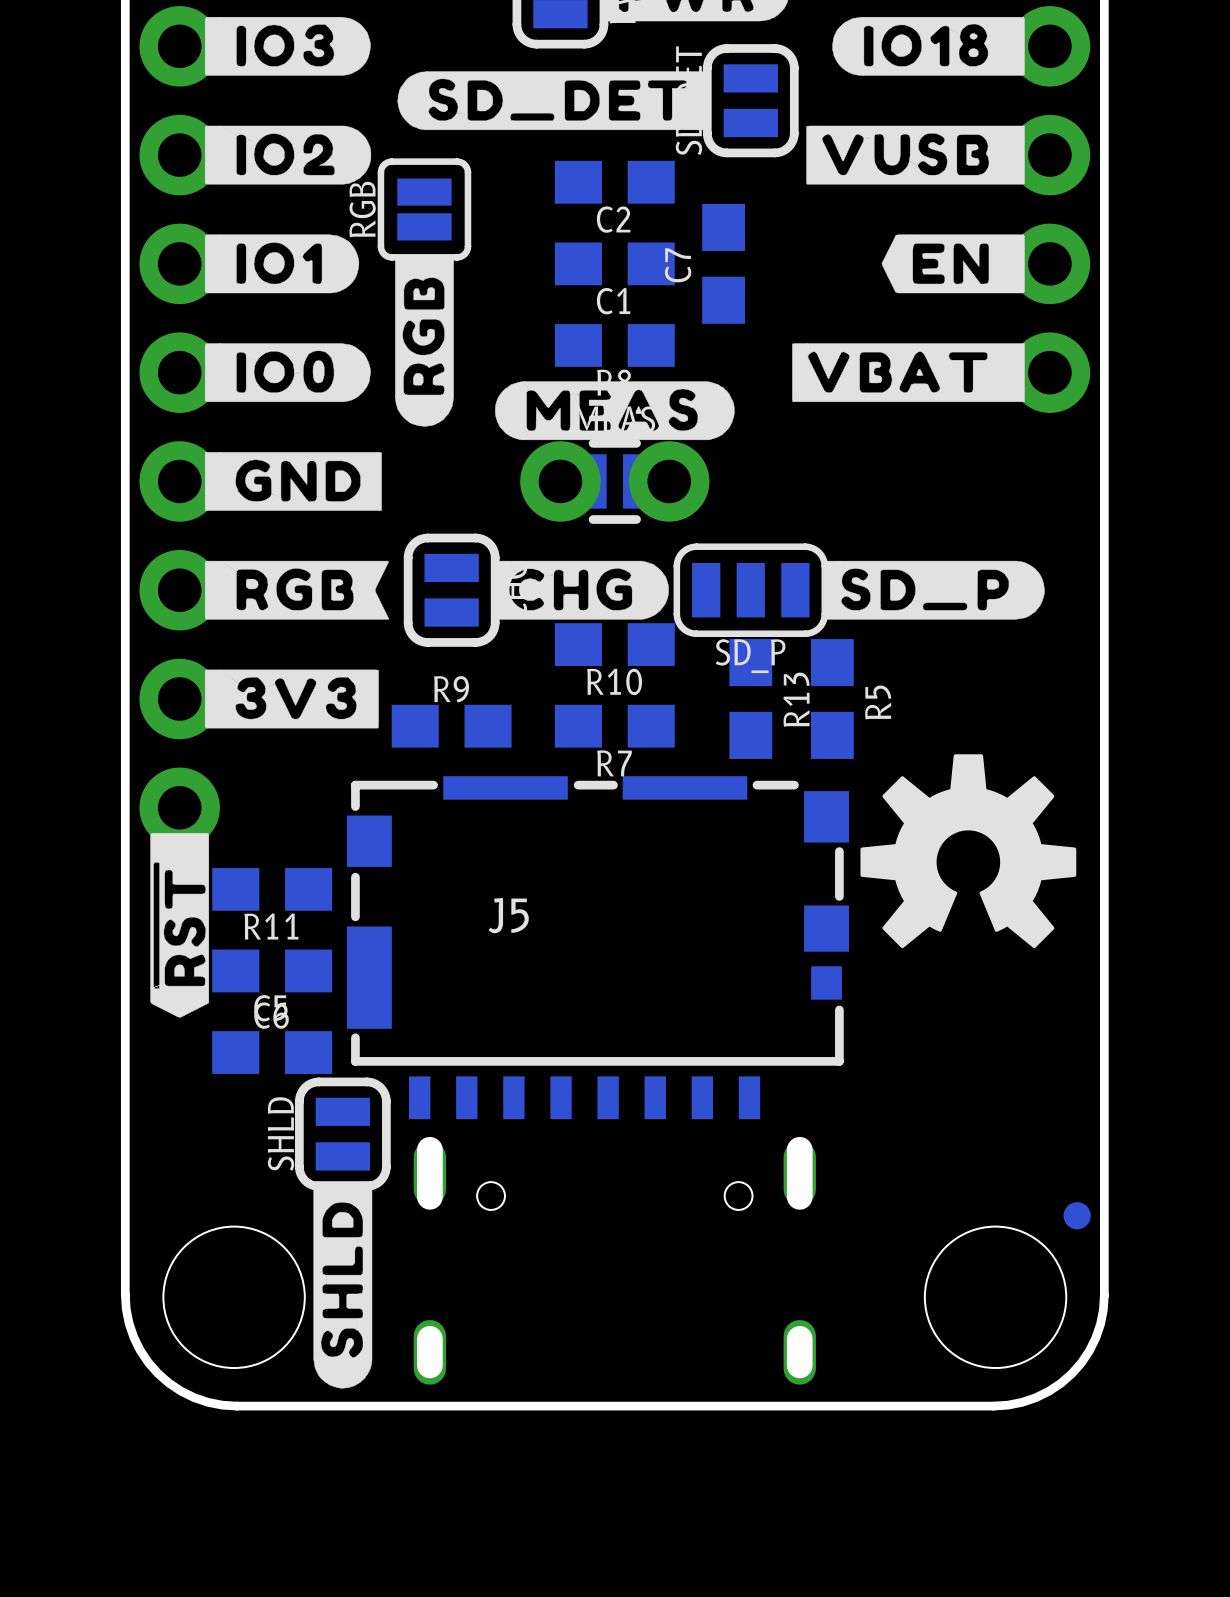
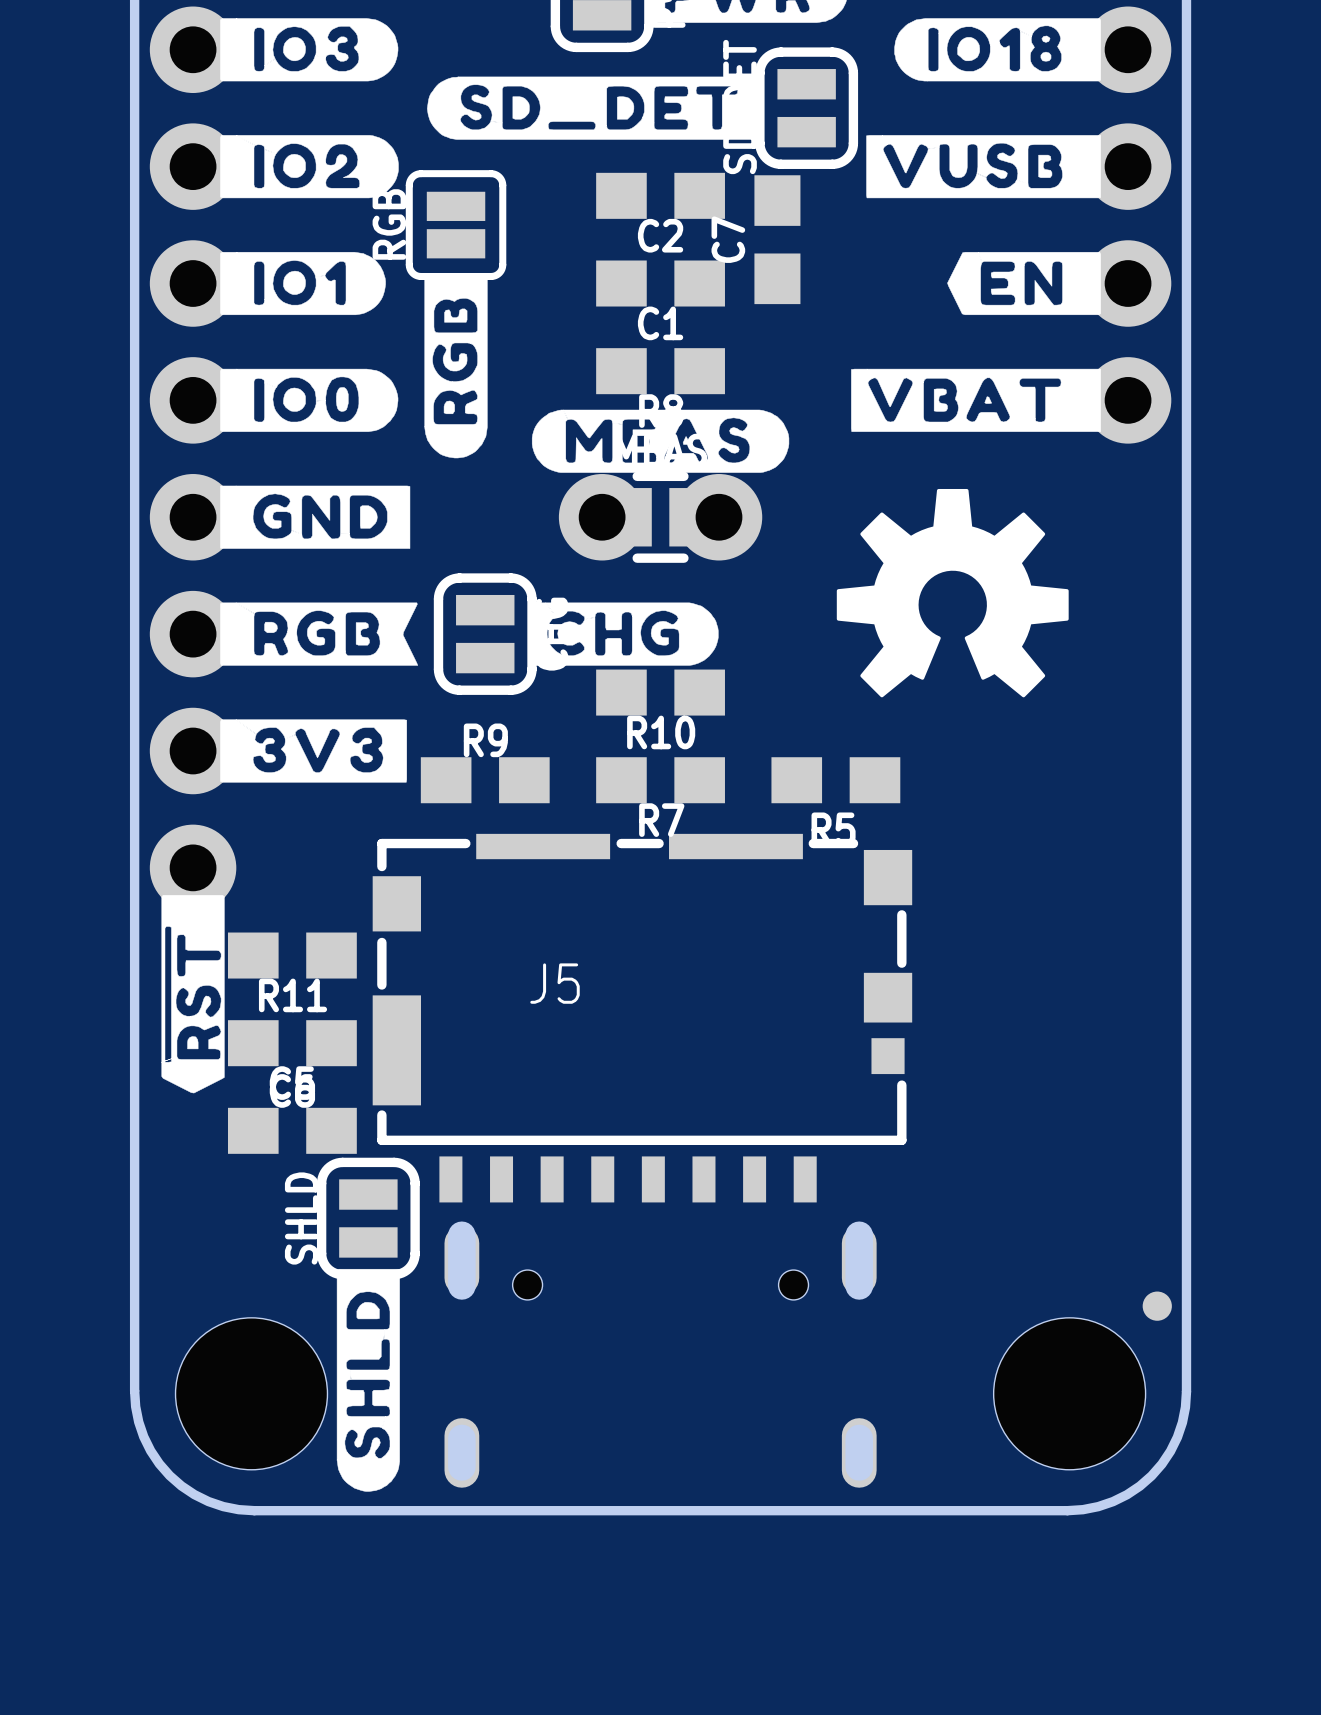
C7 position: (723, 263) -> (777, 239)
drawing: [824, 560, 1045, 620] -> none
SD_P: (750, 590) -> none
R13: (750, 699) -> none
R5 rotation: 0° (832, 699) -> 90° clockwise (835, 780)
drawing position: (968, 851) -> (952, 593)

